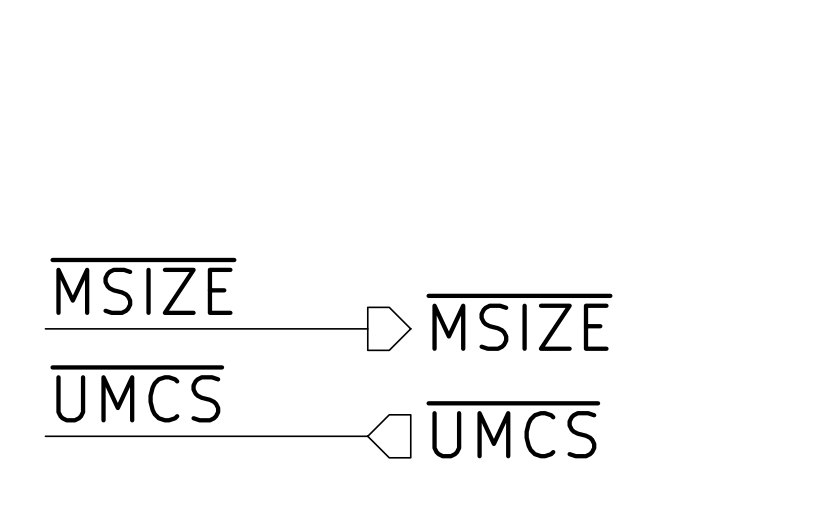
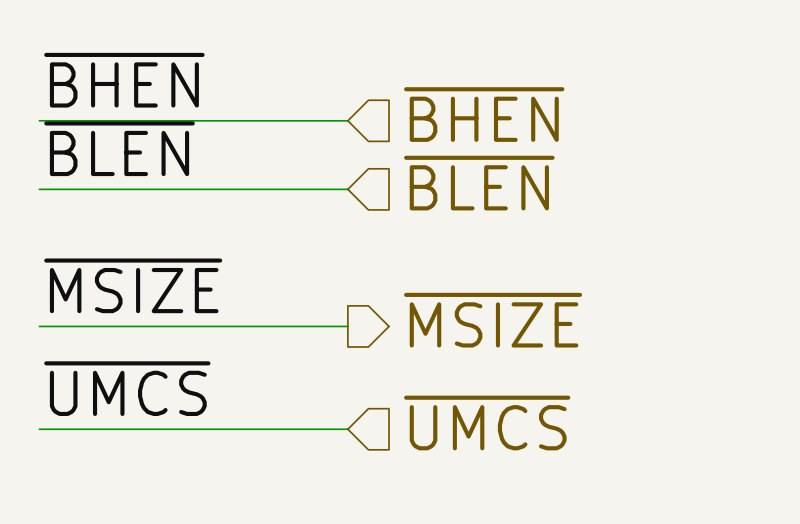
label: none -> ~{BHEN} (124, 80)
hierarchical label: none -> ~{BHEN} (484, 114)
wire: none -> (39, 120) (347, 120)
label: none -> ~{BLEN} (119, 148)
hierarchical label: none -> ~{BLEN} (479, 183)
wire: none -> (39, 189) (347, 189)

